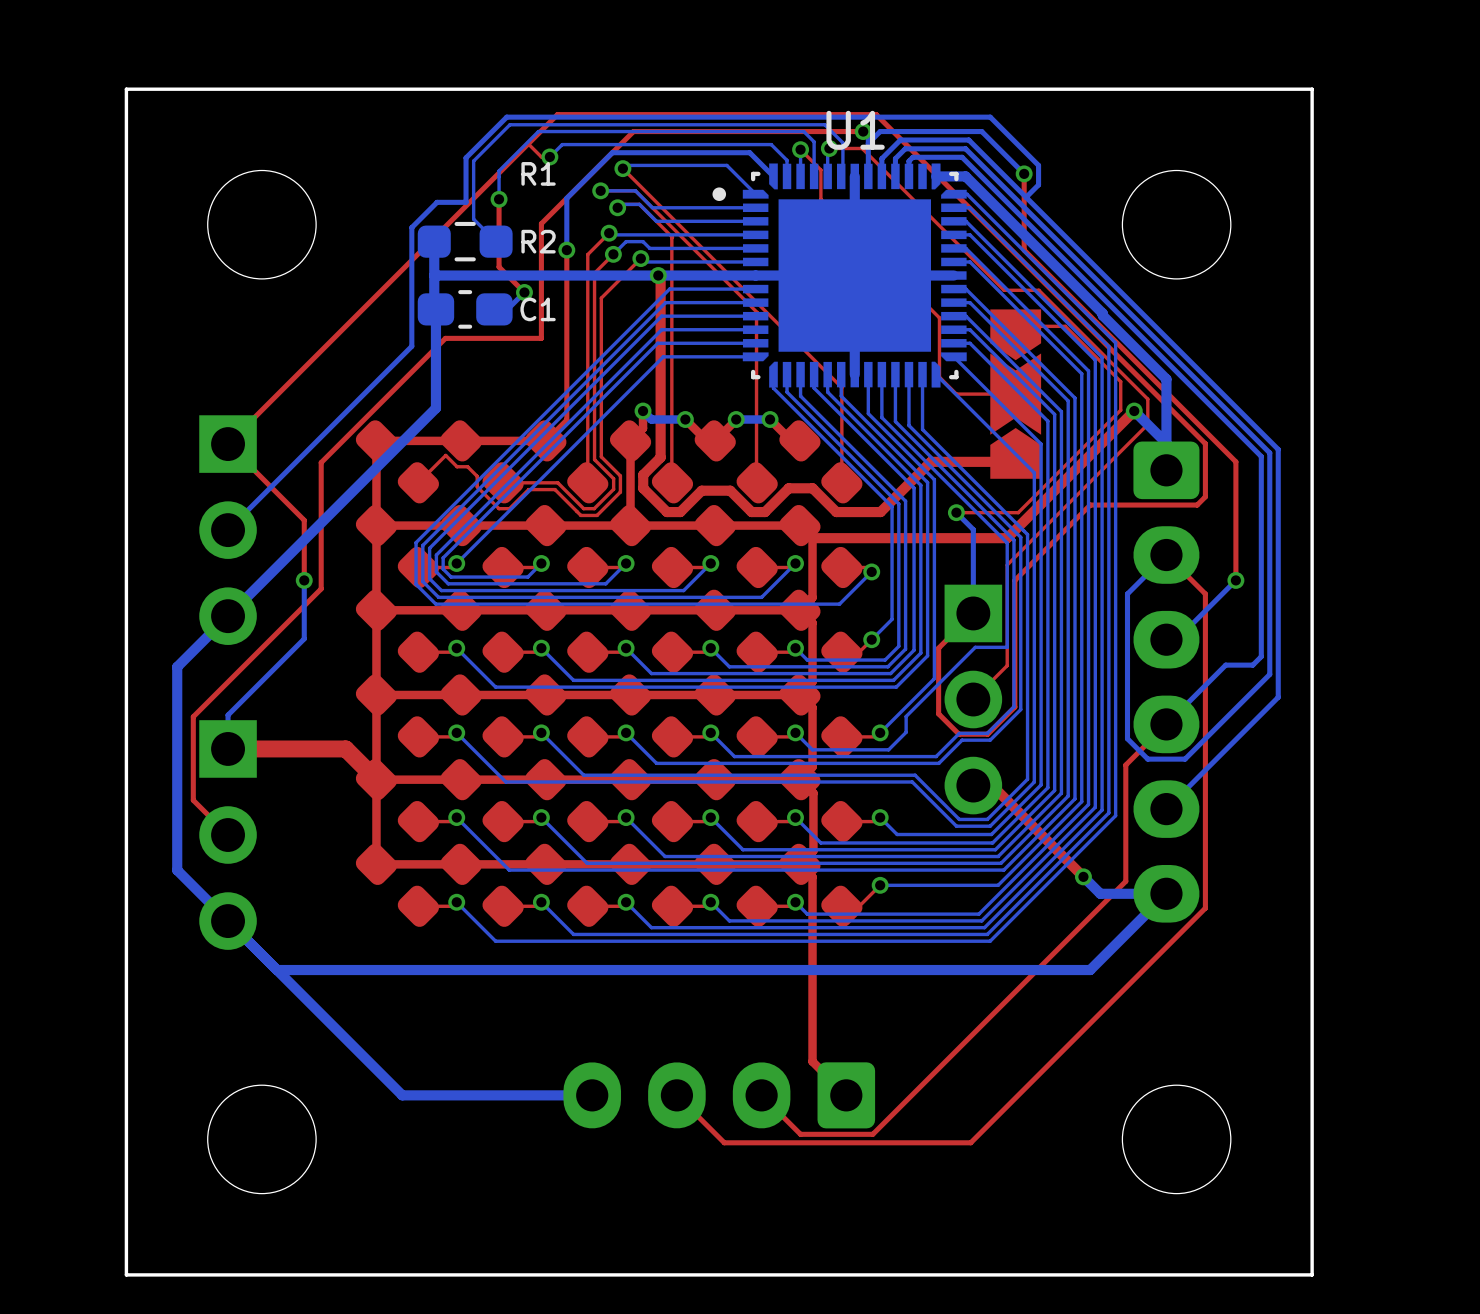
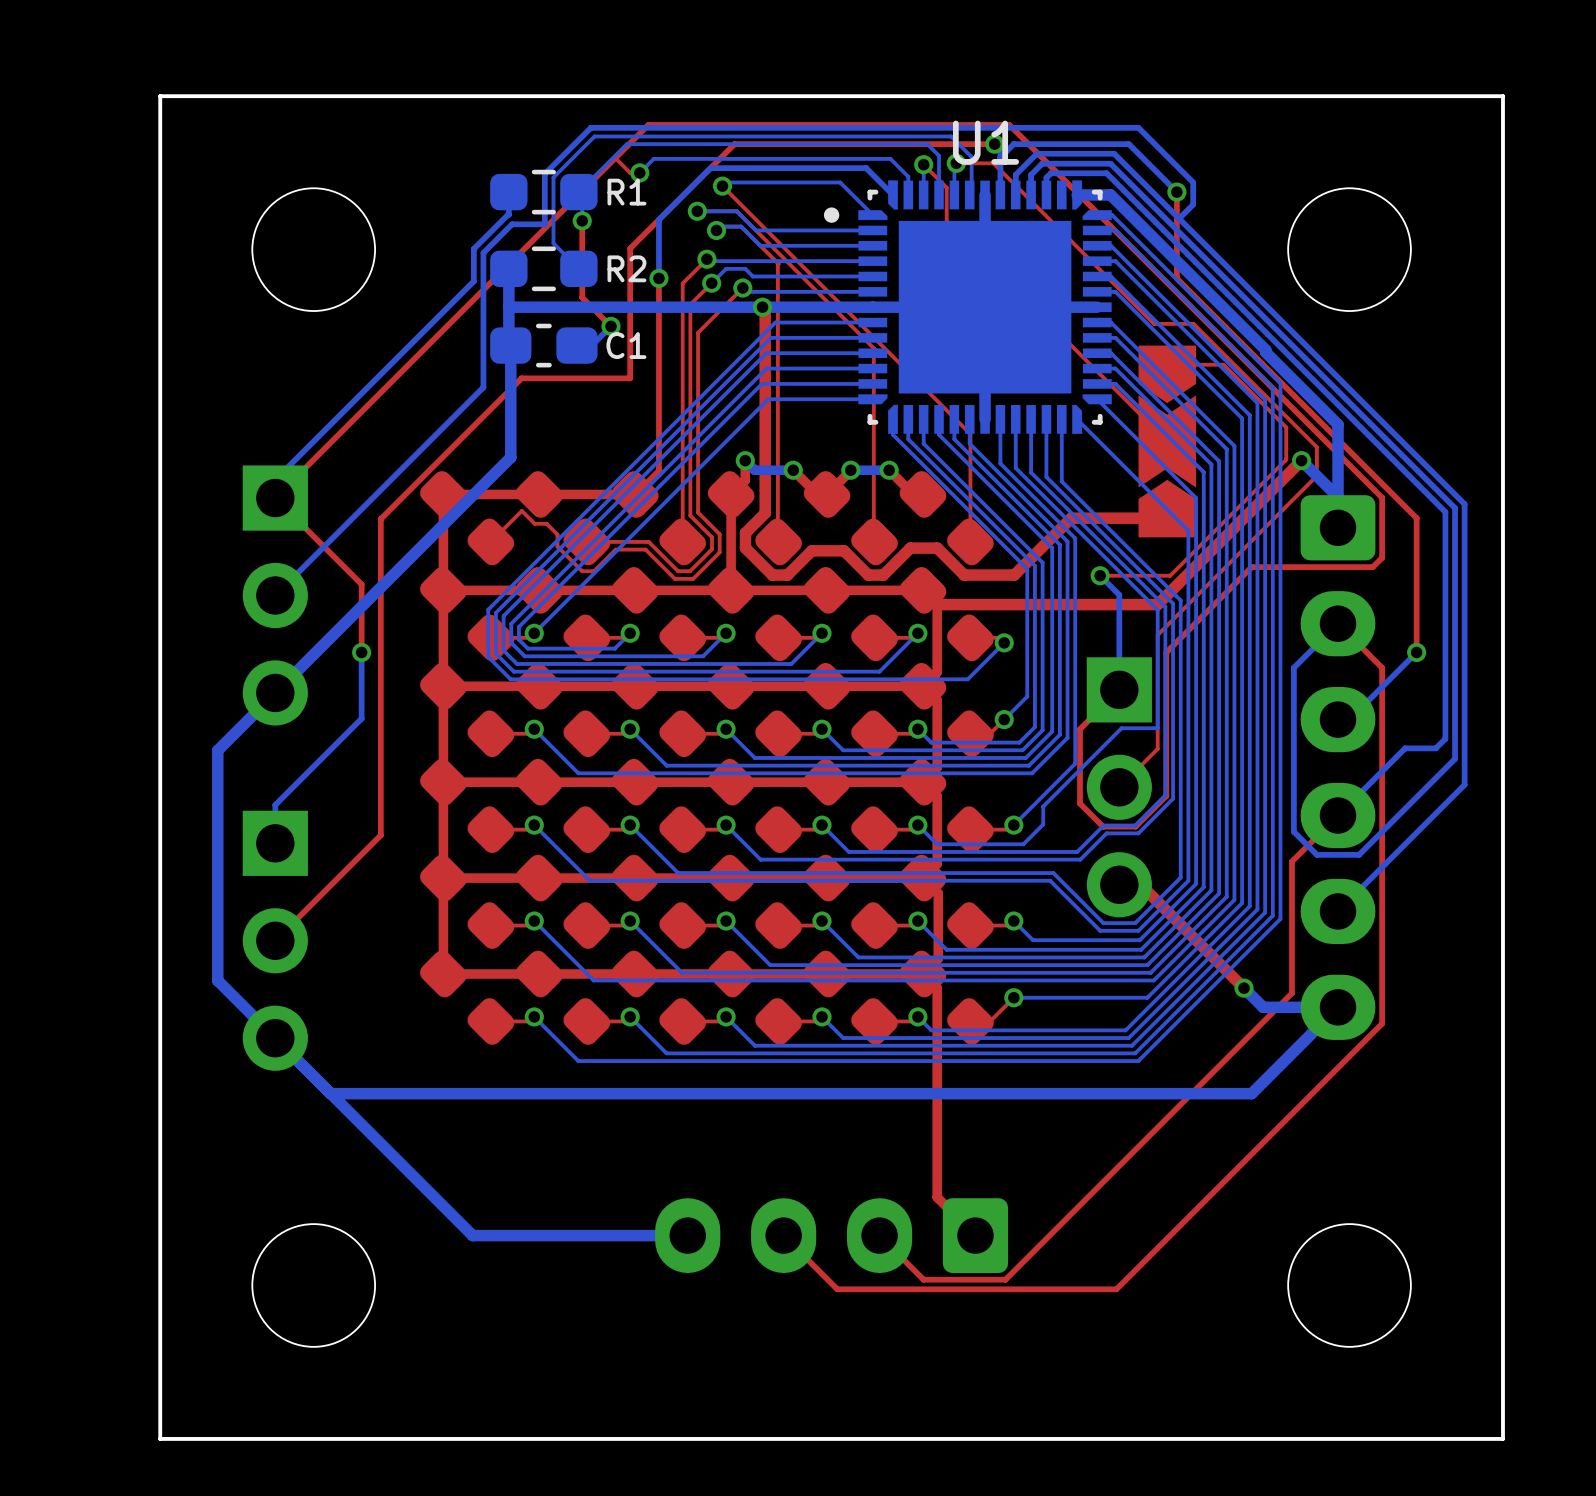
bottom track: none -> (508, 192) (508, 214) (473, 248) (473, 281) (275, 479)
part: none -> (543, 192)
top track: (939, 317) (939, 377) (956, 394) (1015, 394) -> (1080, 355) (1167, 441)
top track: (321, 588) (193, 716) (193, 800) (228, 835) -> (380, 662) (380, 835) (275, 940)
top track: (228, 748) (345, 748) (376, 779) -> none

